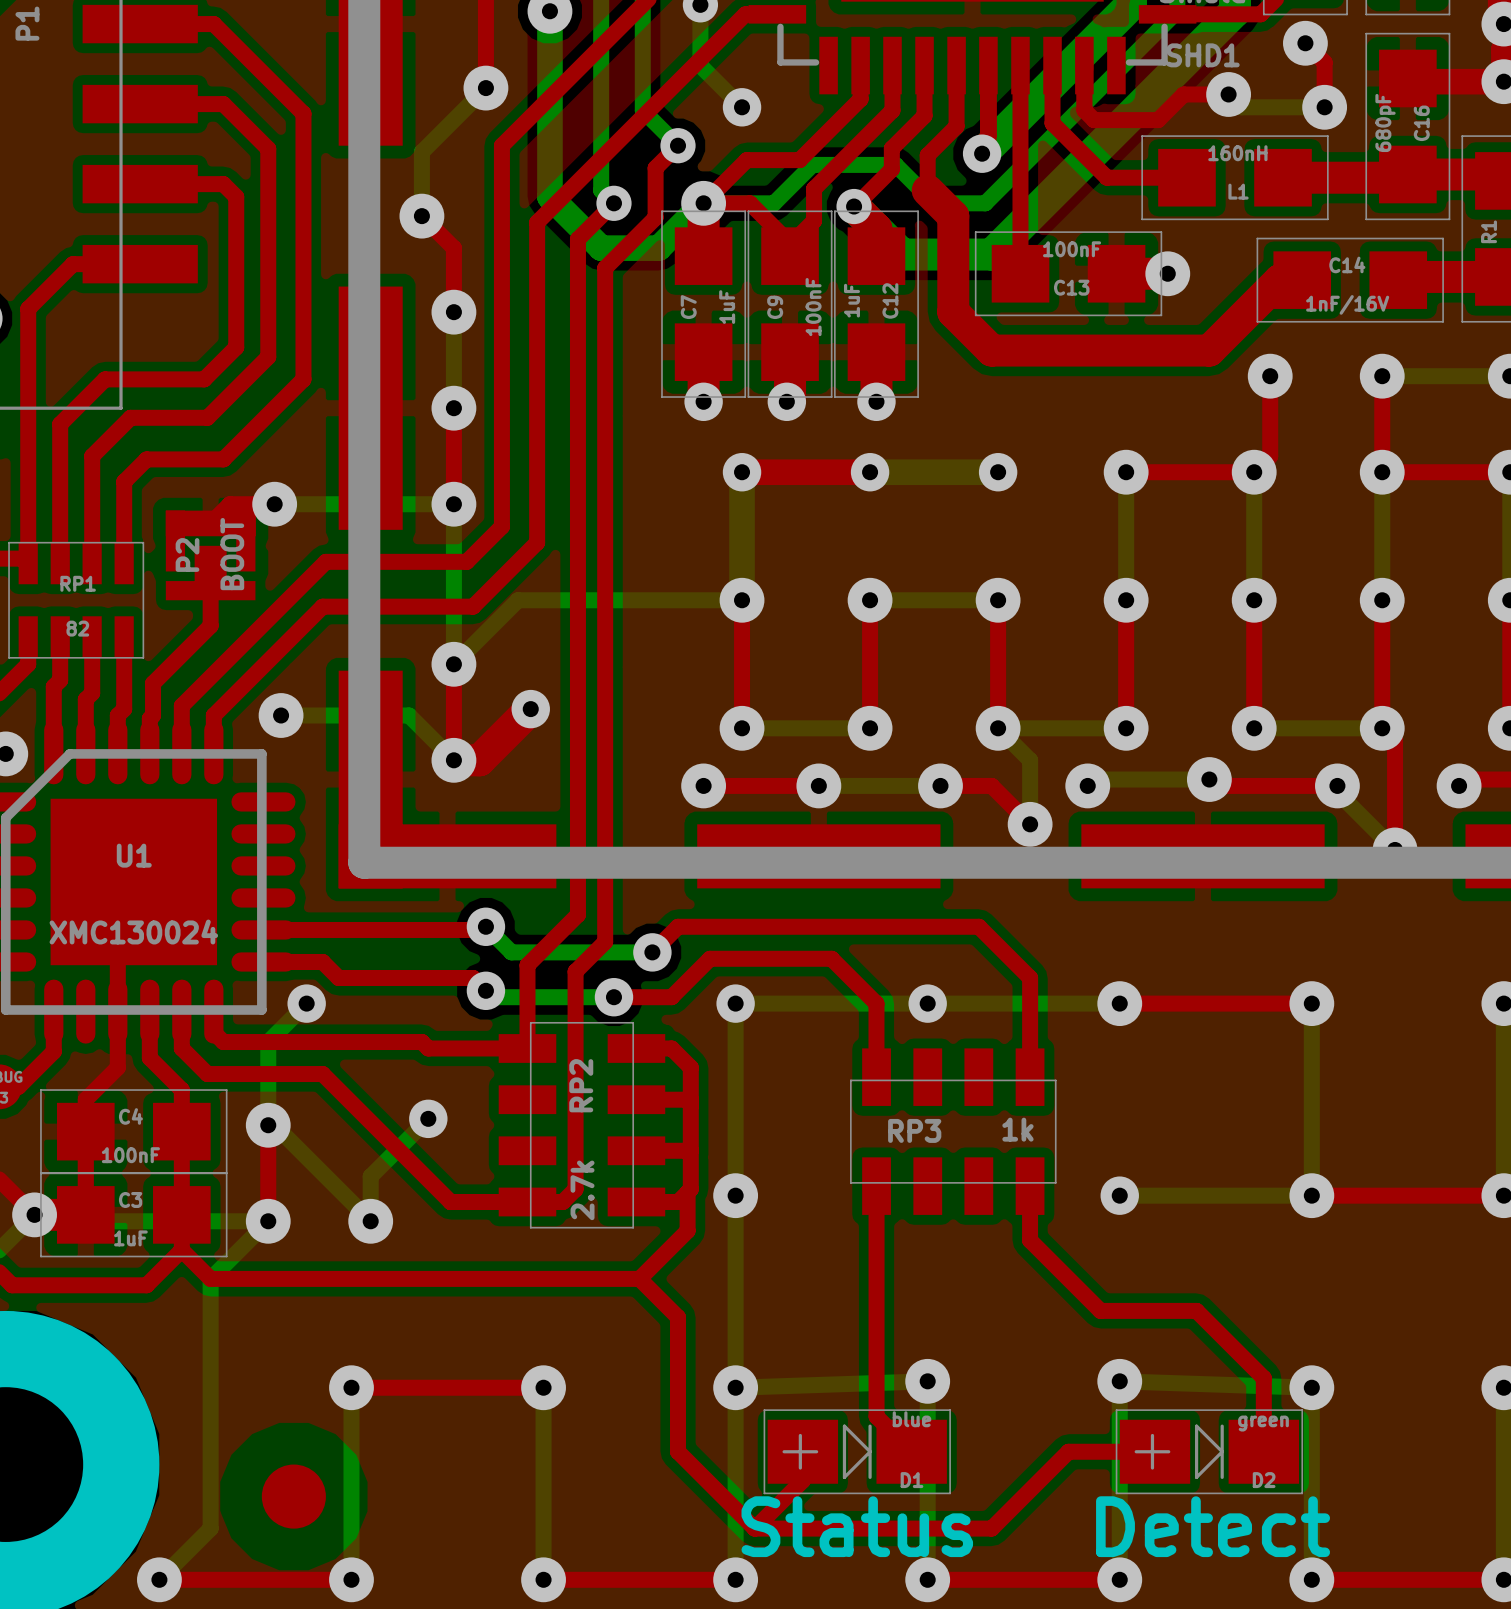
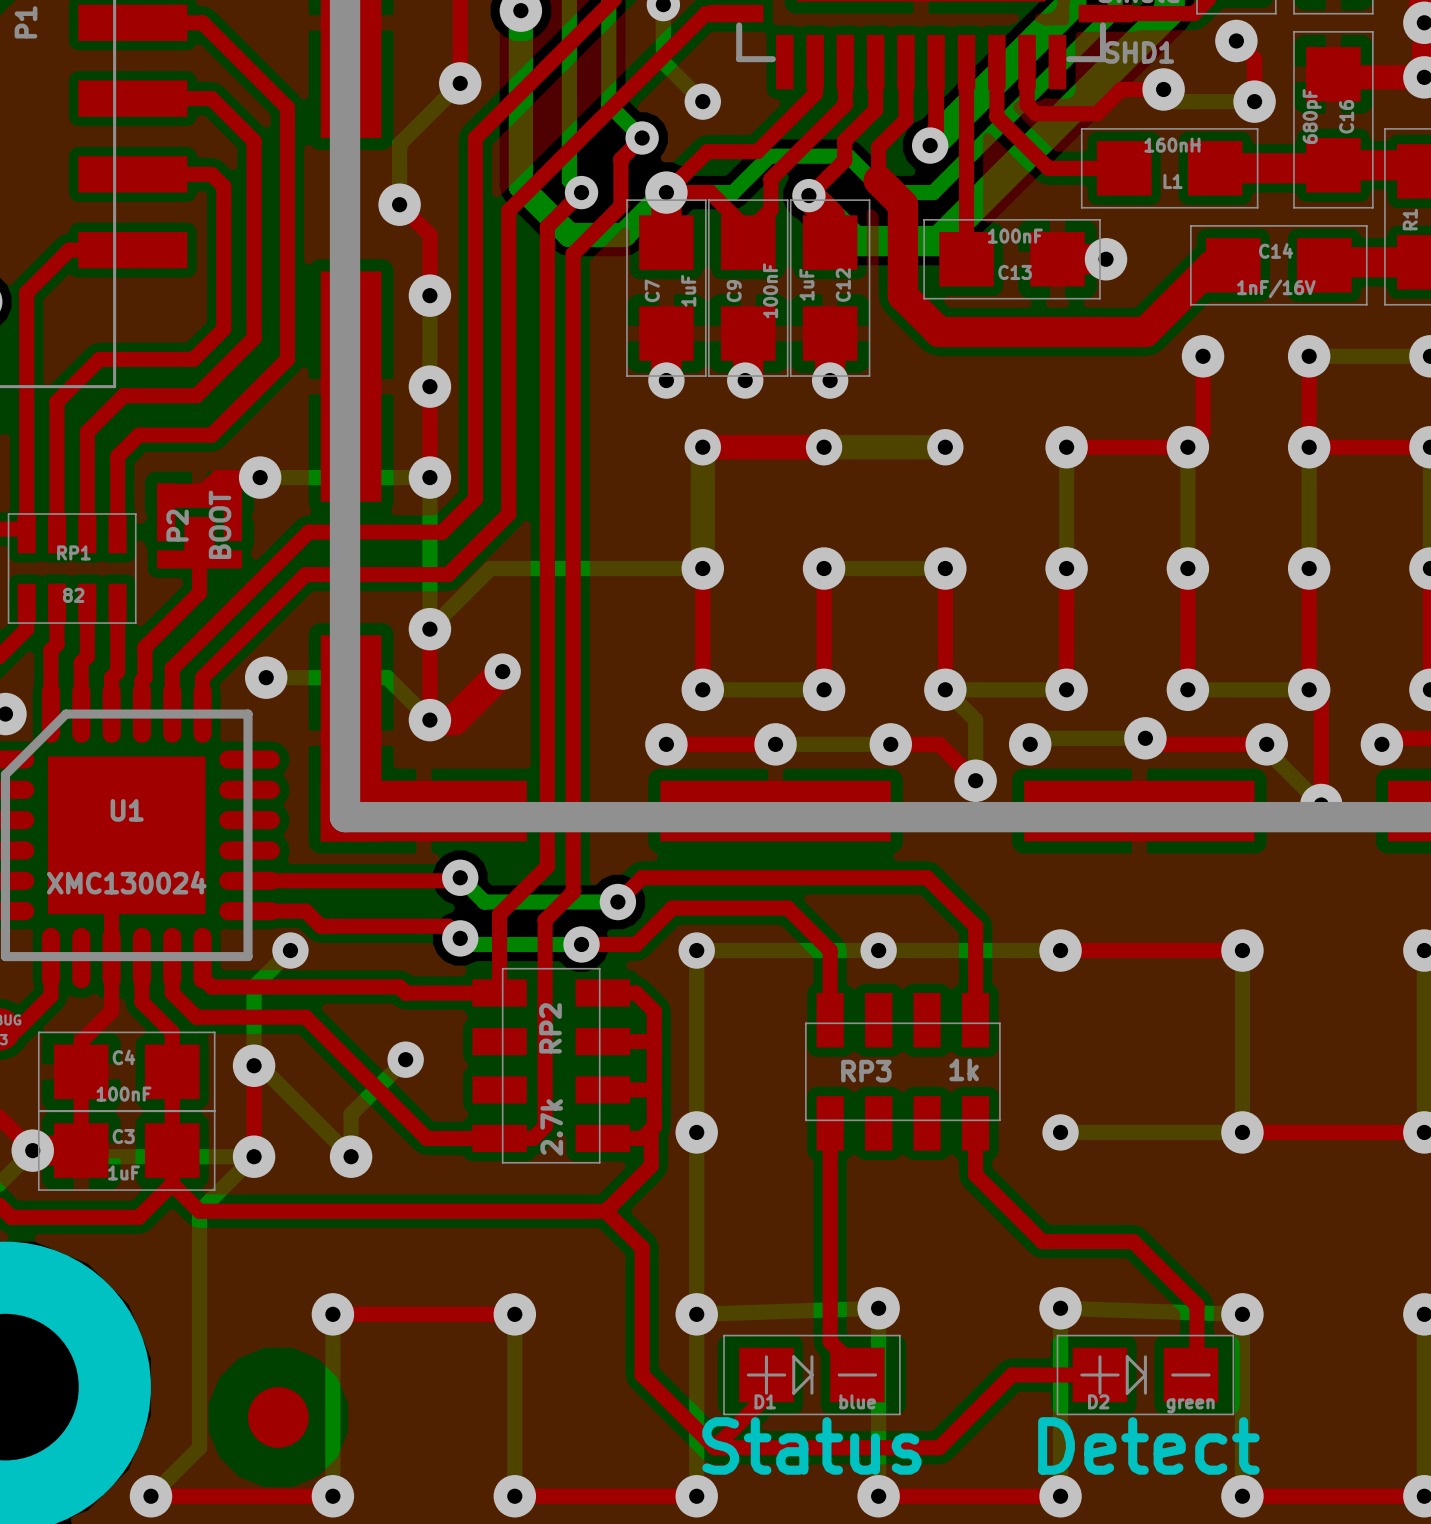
D1 footprint: [764, 1410, 951, 1494] -> [723, 1335, 900, 1415]
D2 footprint: [1116, 1410, 1303, 1494] -> [1057, 1335, 1234, 1415]
D1 value position: blue (911, 1419) -> blue (857, 1401)
D2 value position: green (1263, 1423) -> green (1190, 1405)
D1 name position: D1 (911, 1480) -> D1 (765, 1401)
D2 name position: D2 (1264, 1480) -> D2 (1098, 1401)

